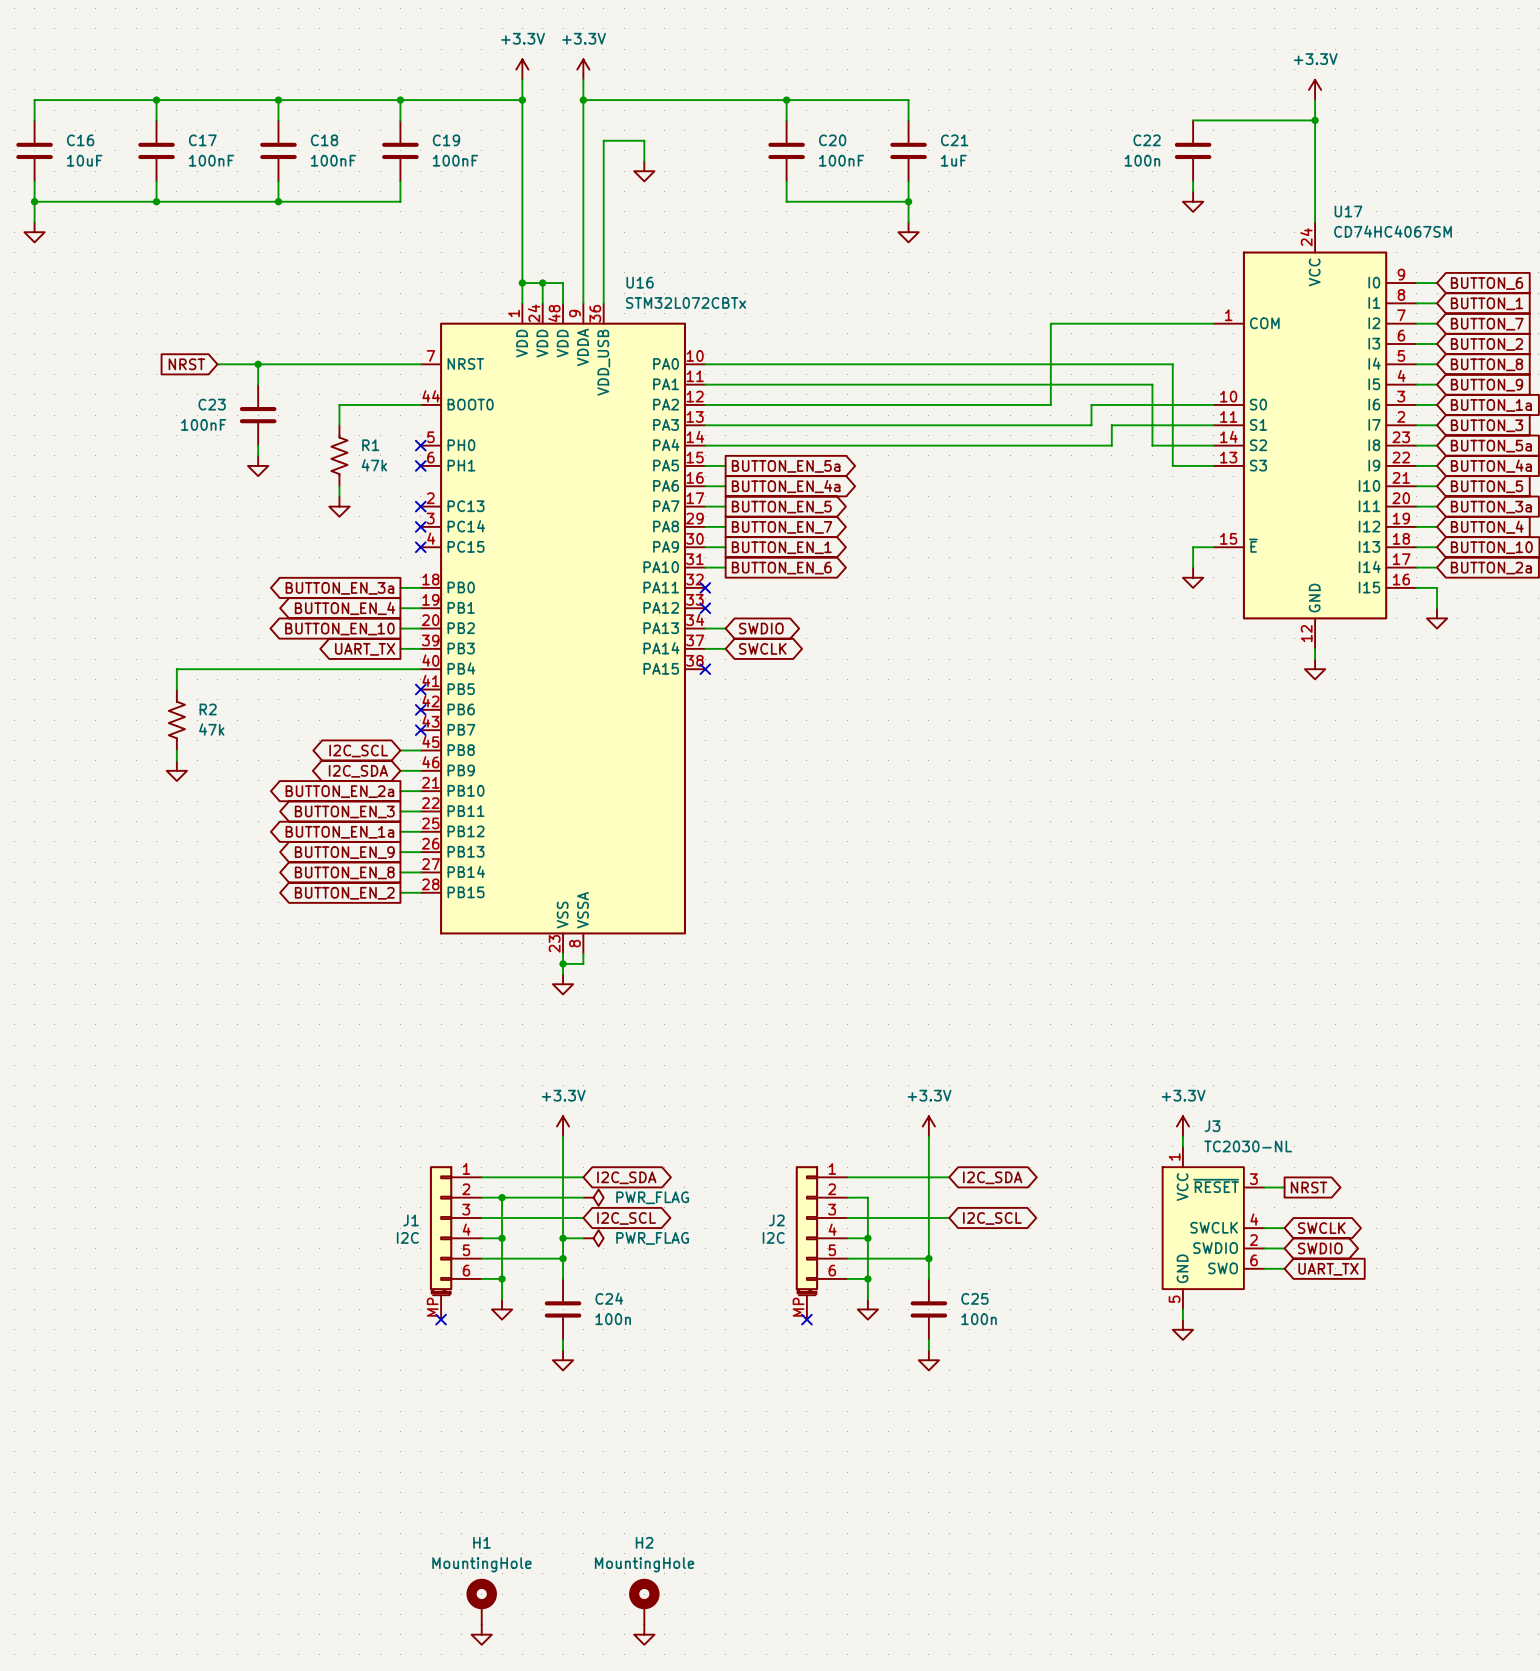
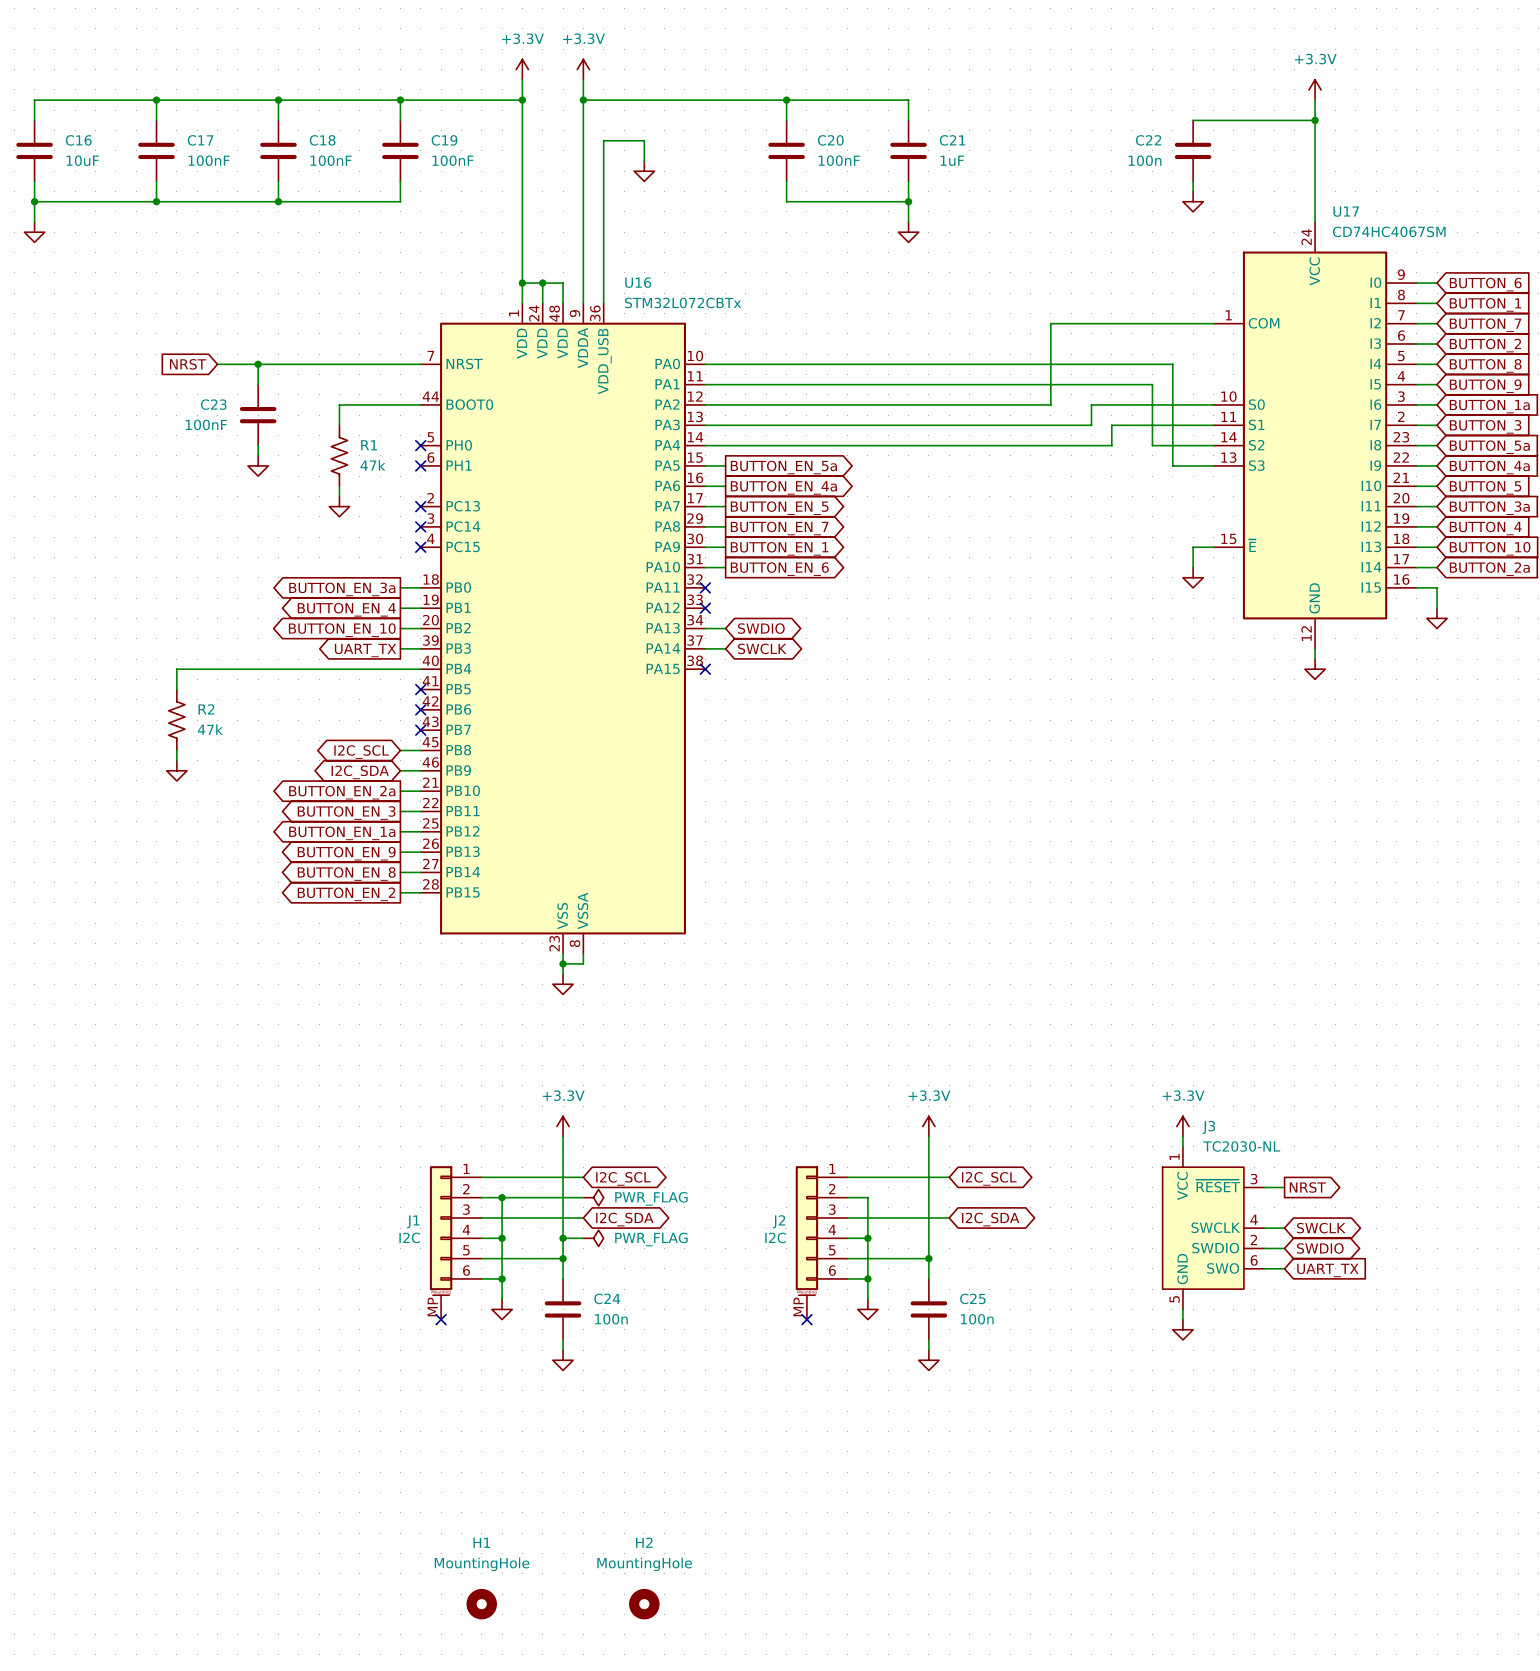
global label: I2C_SDA (626, 1177) -> I2C_SCL (623, 1178)
global label: I2C_SDA (992, 1177) -> I2C_SCL (989, 1178)
global label: I2C_SCL (626, 1218) -> I2C_SDA (624, 1219)
global label: I2C_SCL (992, 1218) -> I2C_SDA (990, 1219)
H1 symbol: [466, 1578, 497, 1625] -> [466, 1588, 497, 1620]
H2 symbol: [629, 1578, 660, 1625] -> [629, 1588, 660, 1620]
power symbol: (481, 1634) -> none
power symbol: (644, 1634) -> none

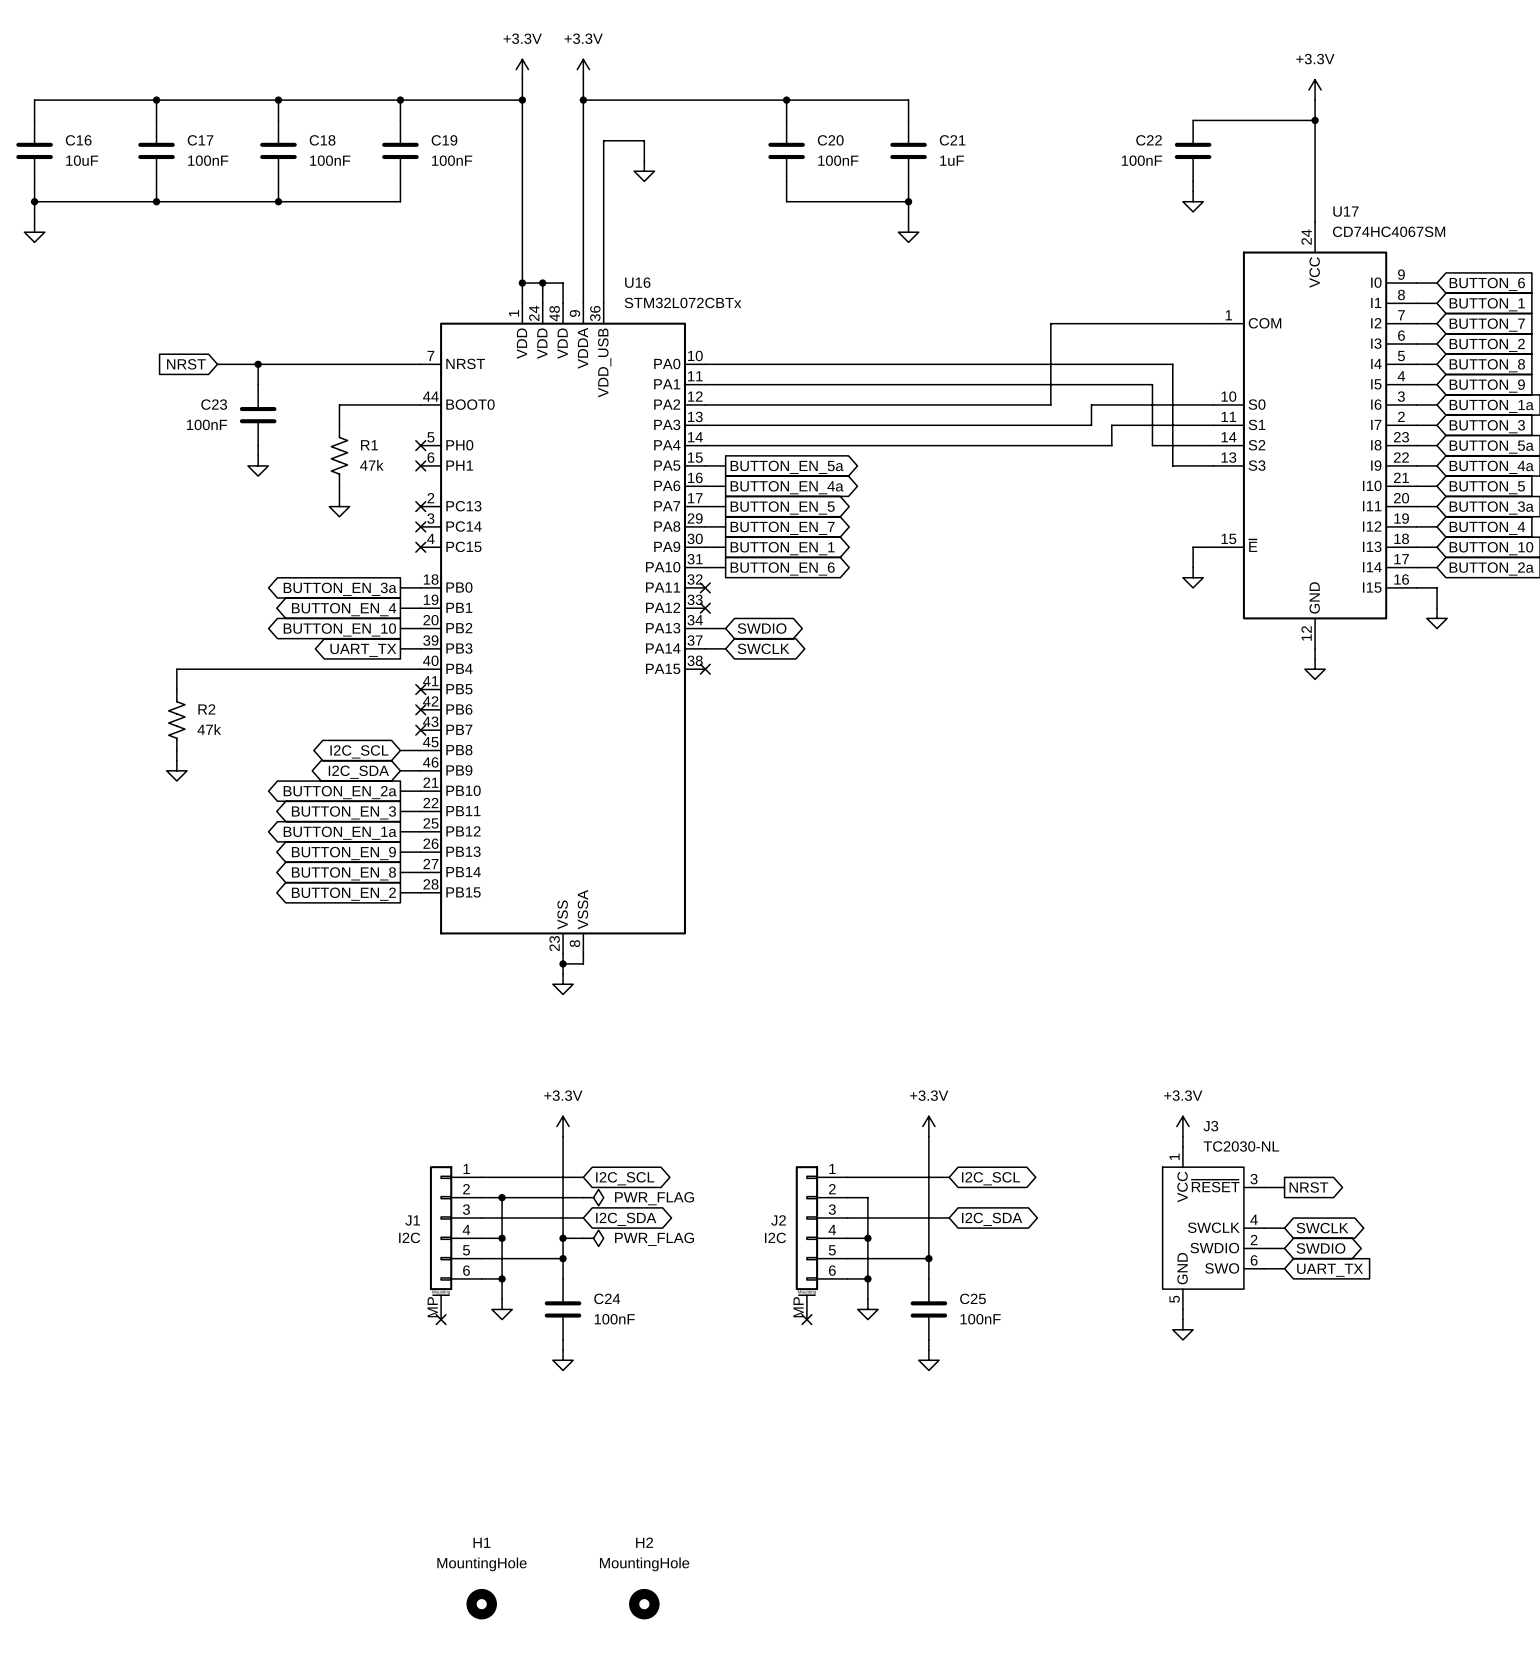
C22 value: 100n (1145, 160) -> 100nF (1141, 160)
C24 value: 100n (611, 1319) -> 100nF (614, 1319)
C25 value: 100n (977, 1319) -> 100nF (980, 1319)

